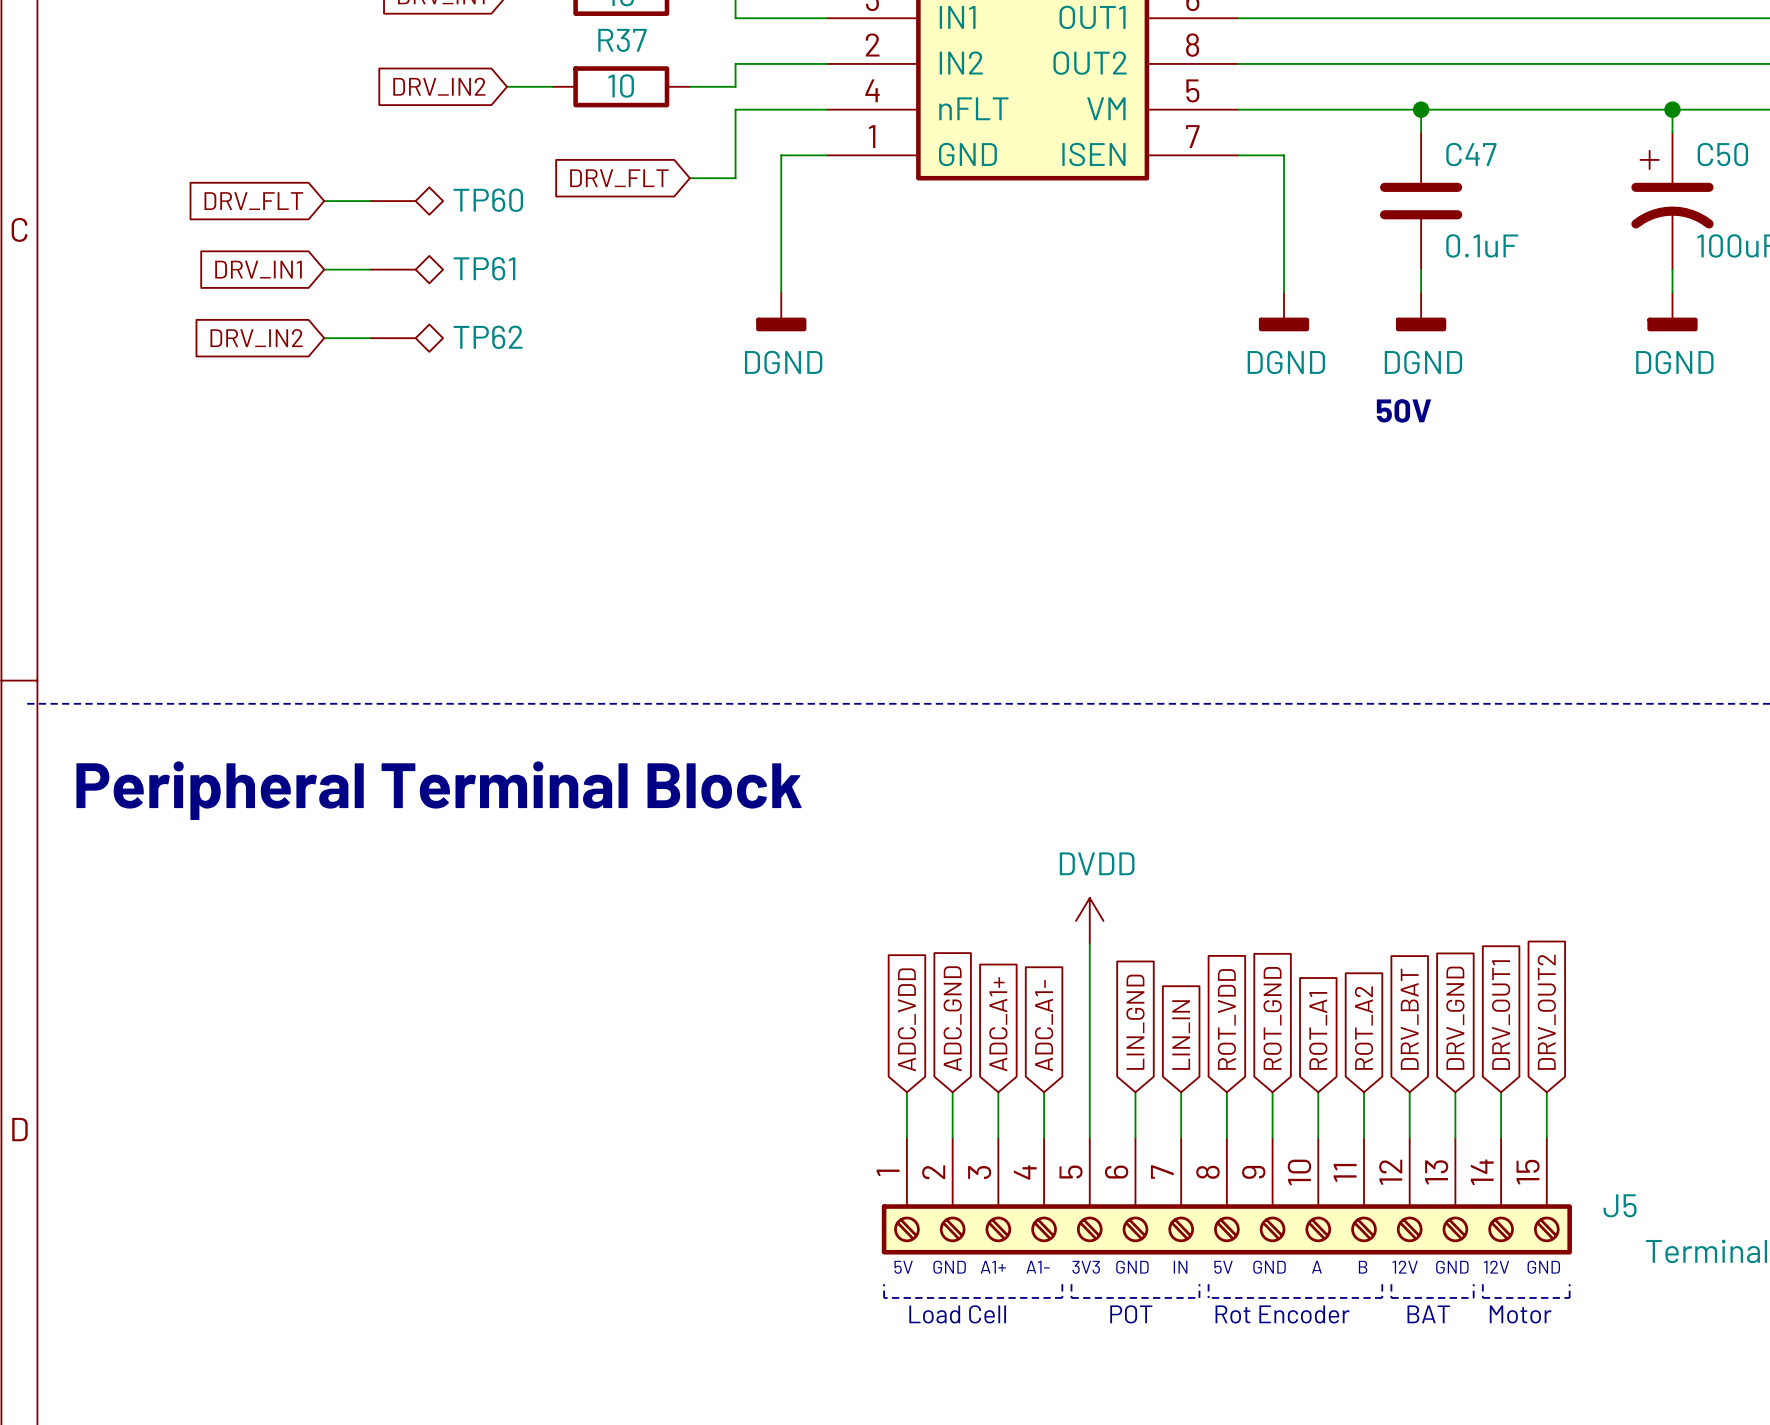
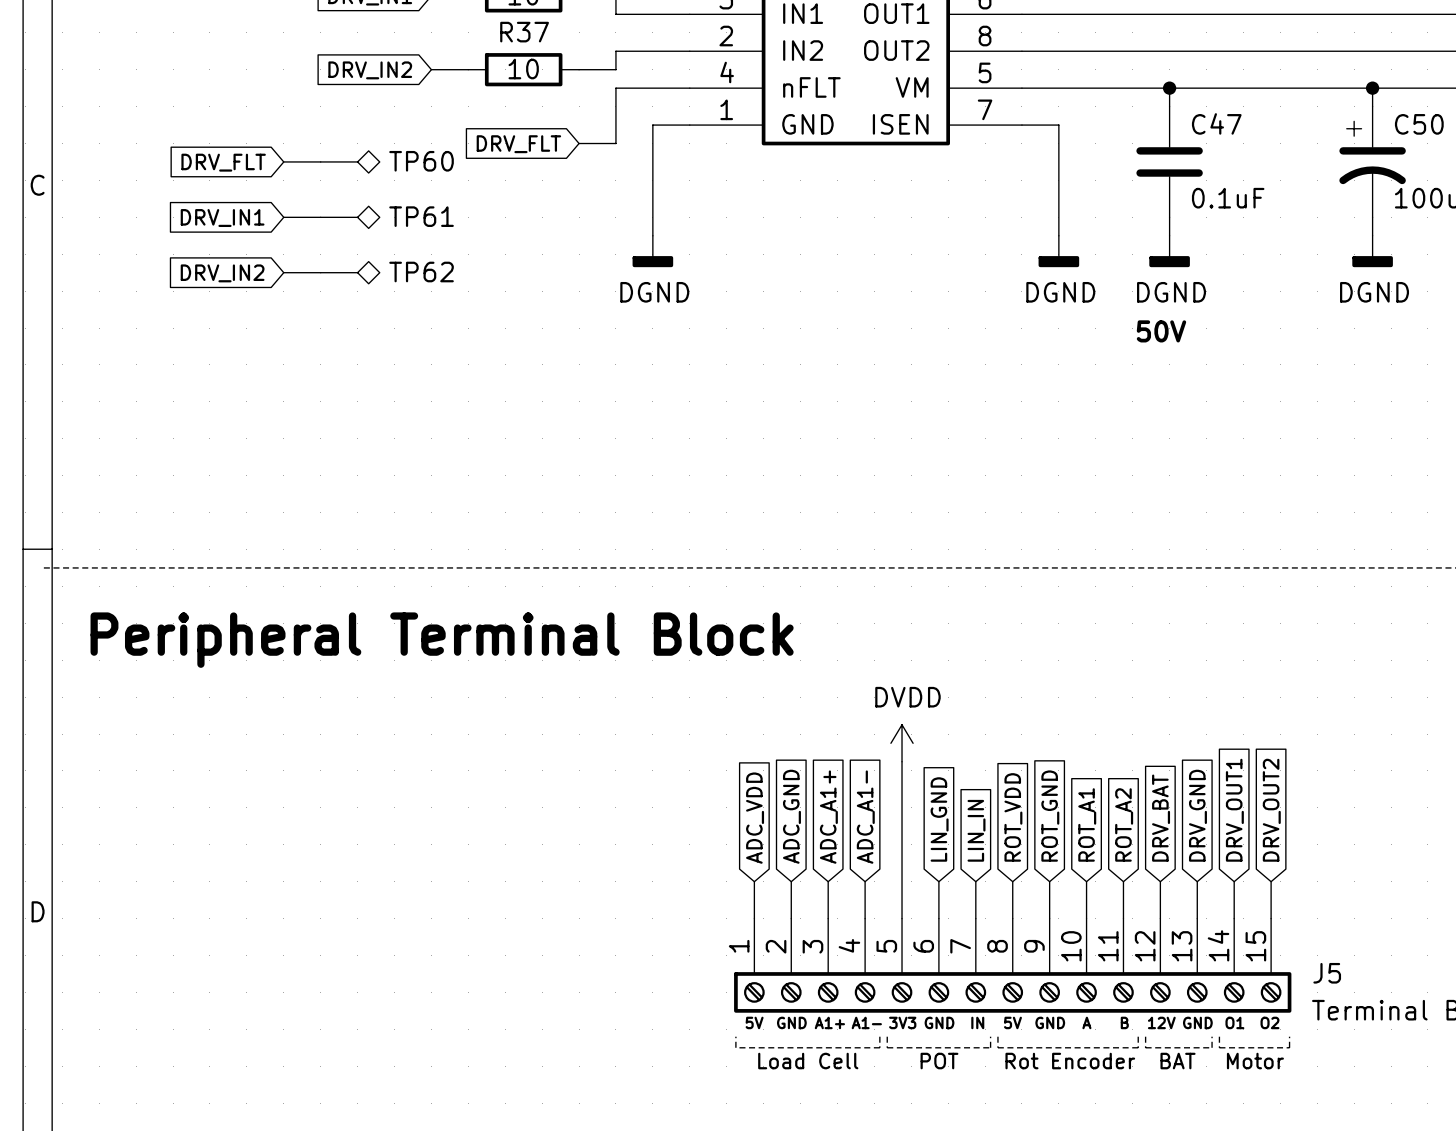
text: 12V (1496, 1267) -> O1 (1234, 1022)
text: GND (1543, 1267) -> O2 (1269, 1022)

